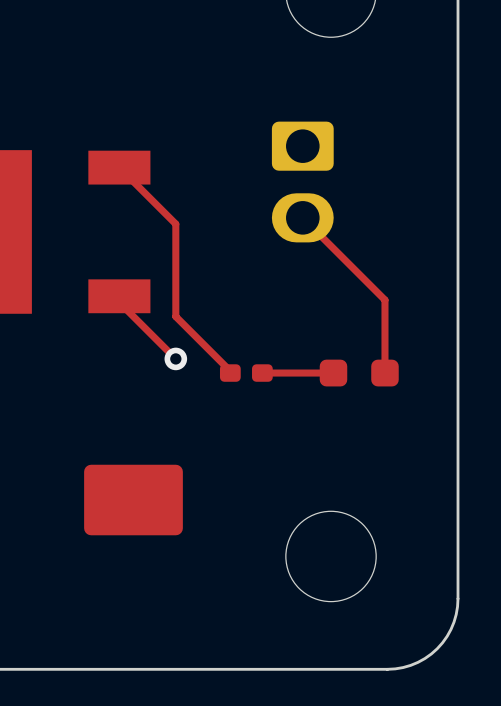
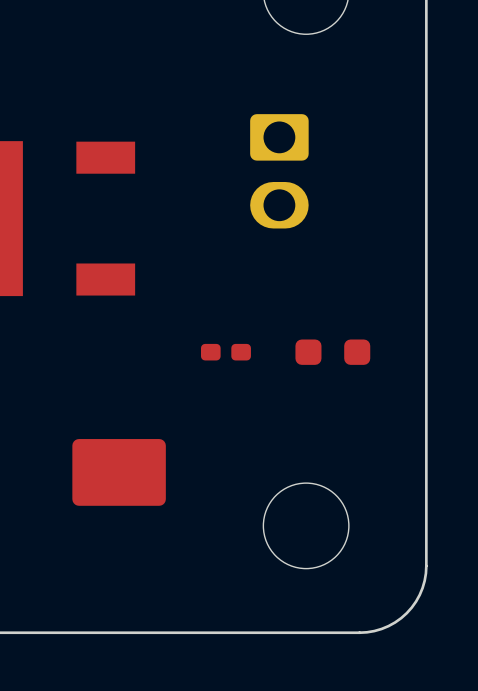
top track: (119, 167) (175, 224) (175, 316) (230, 373) -> none
top track: (302, 217) (384, 300) (384, 373) -> none
top track: (119, 296) (119, 302) (175, 358) -> none
via: (175, 358) -> none
top track: (333, 373) (262, 373) -> none

